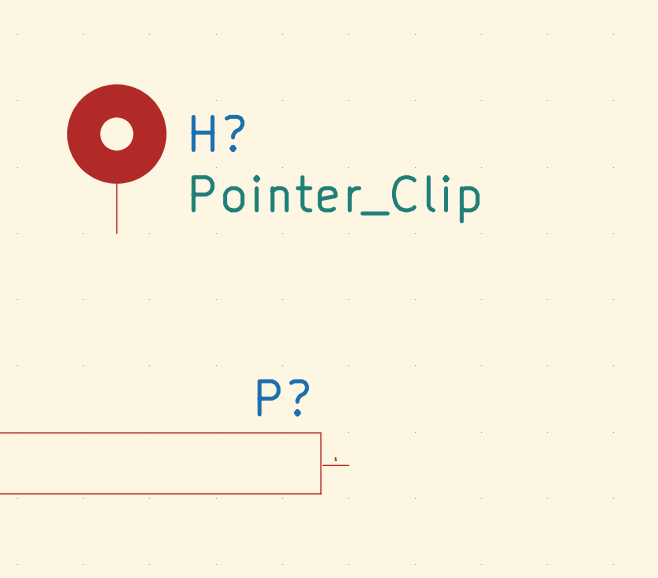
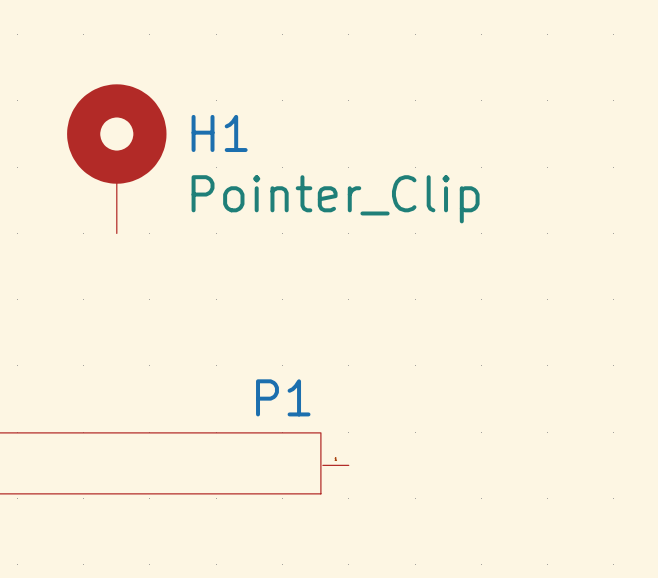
H? name: H? (218, 133) -> H1 (219, 133)
P? name: P? (283, 397) -> P1 (283, 397)

